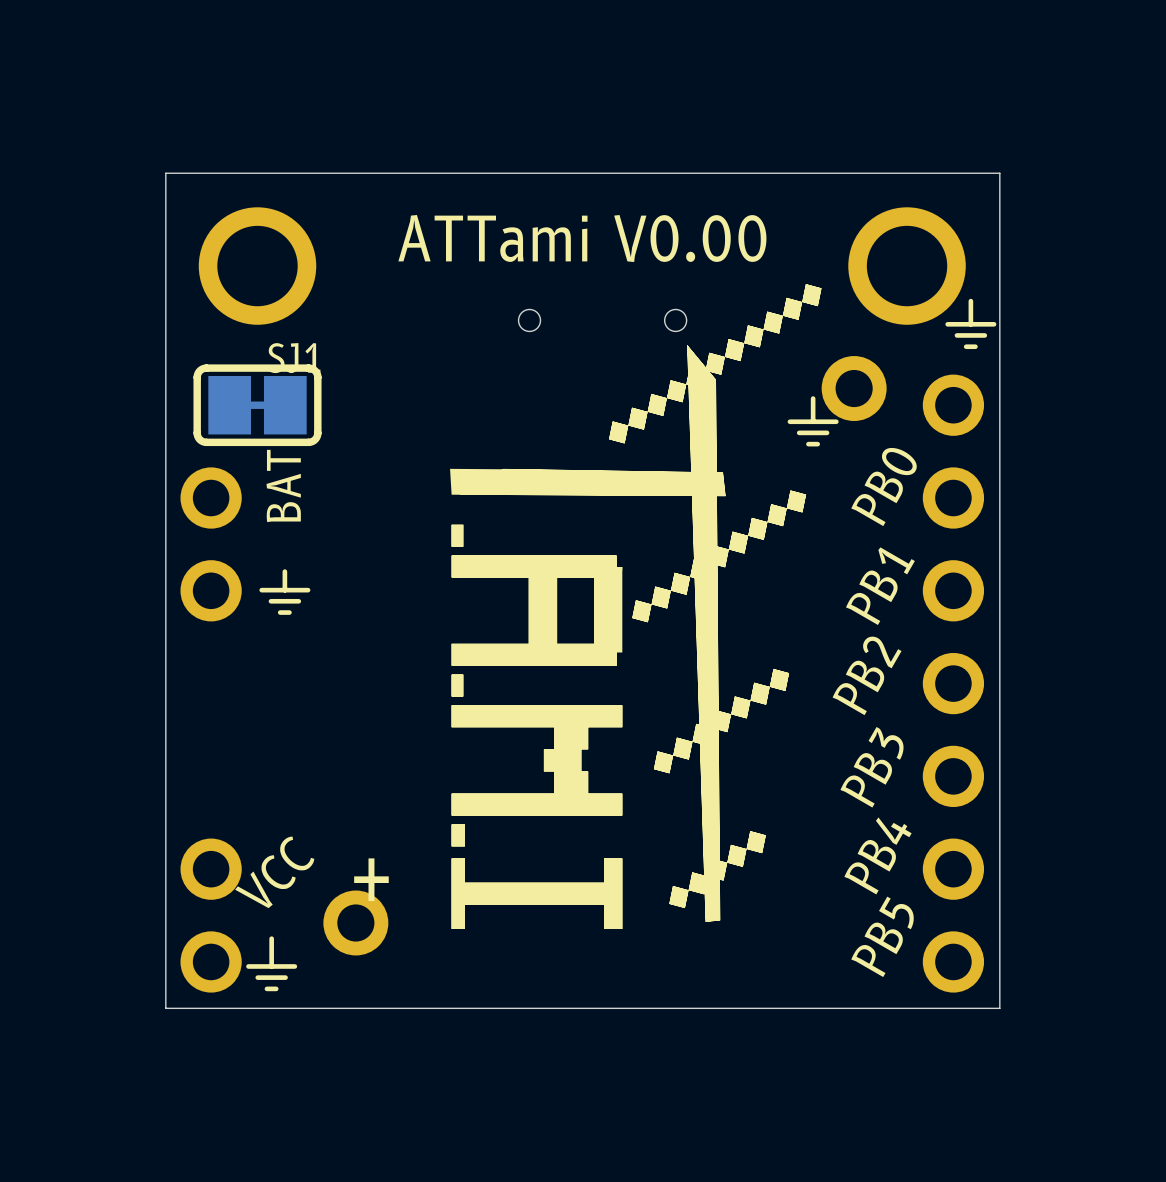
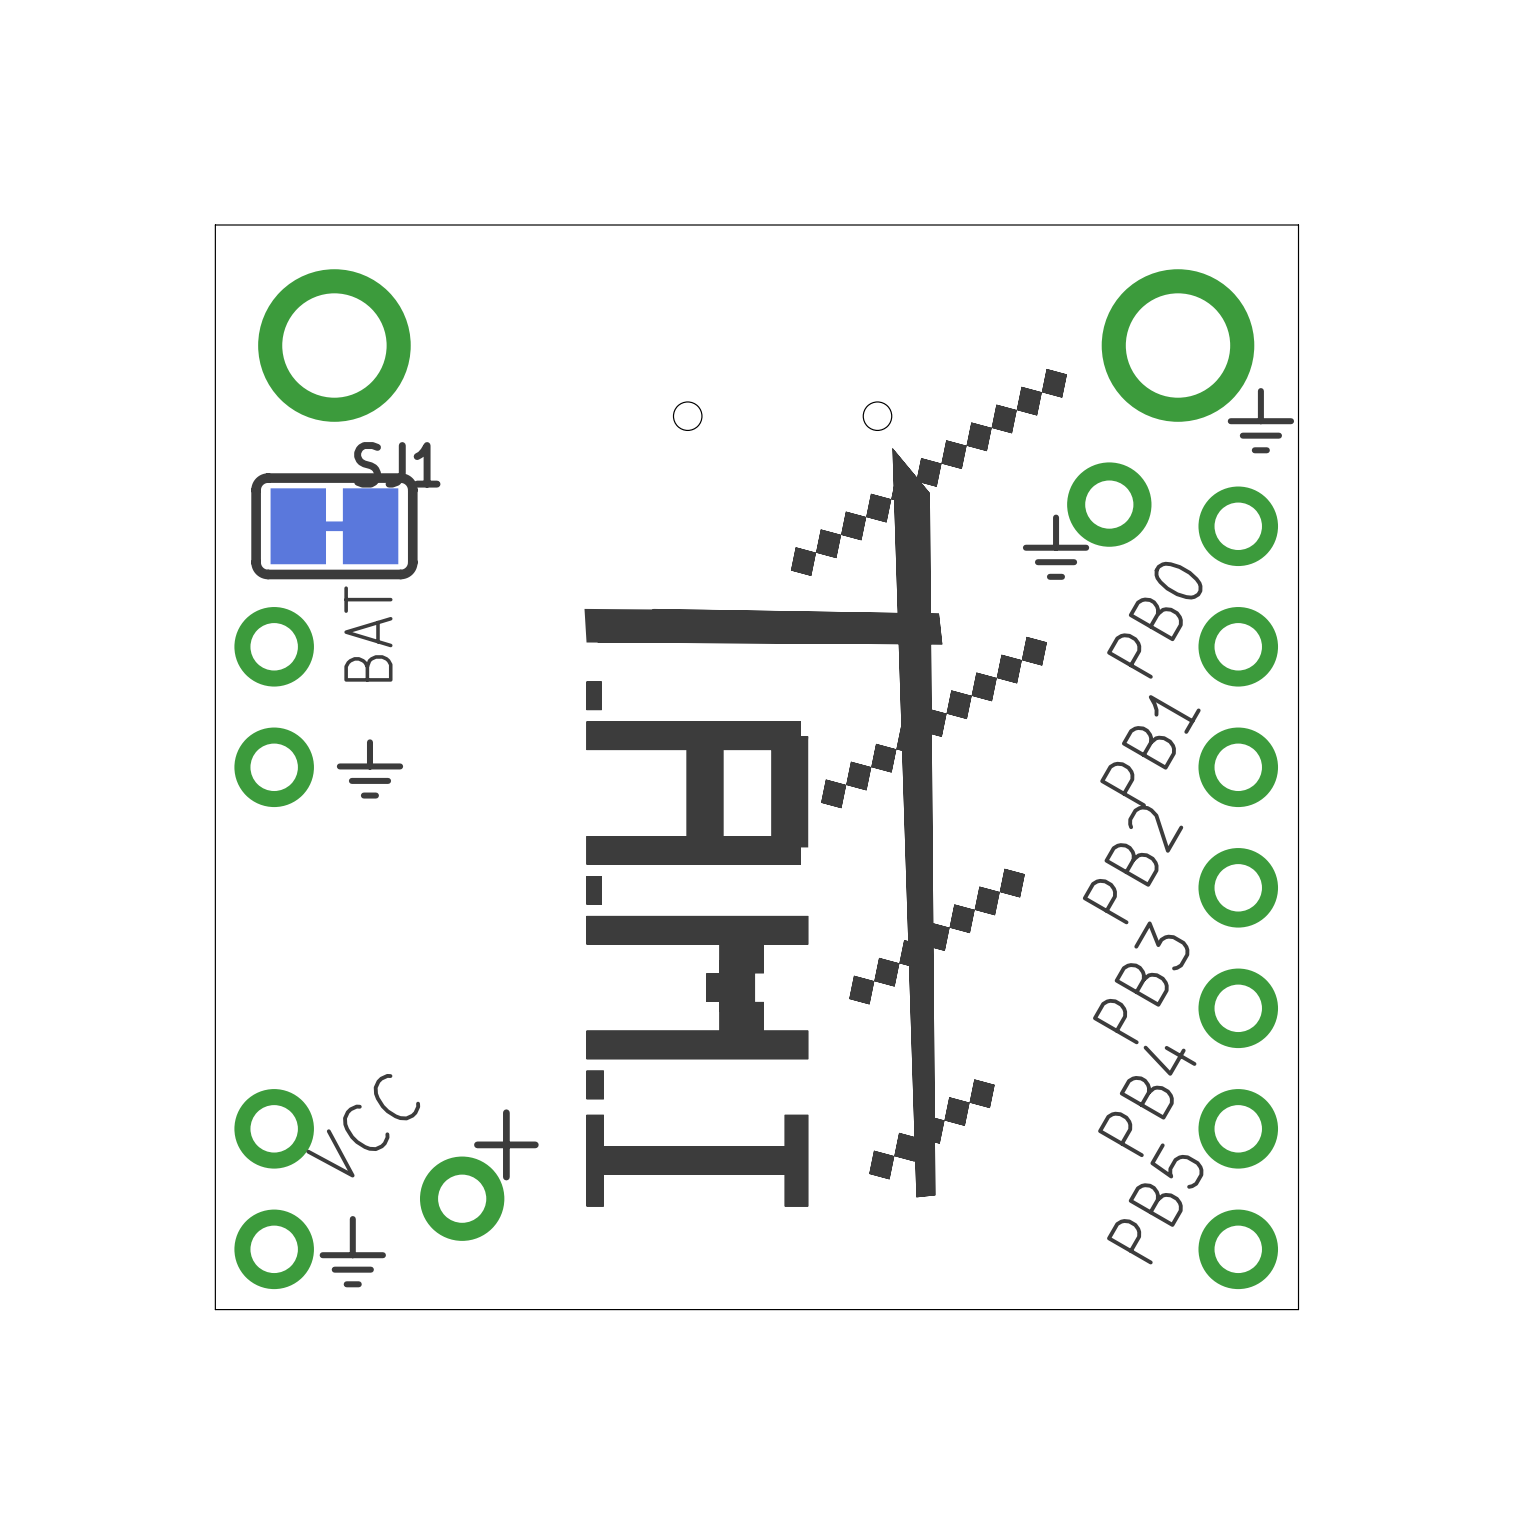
text: ATTami V0.00 (582, 238) -> none

